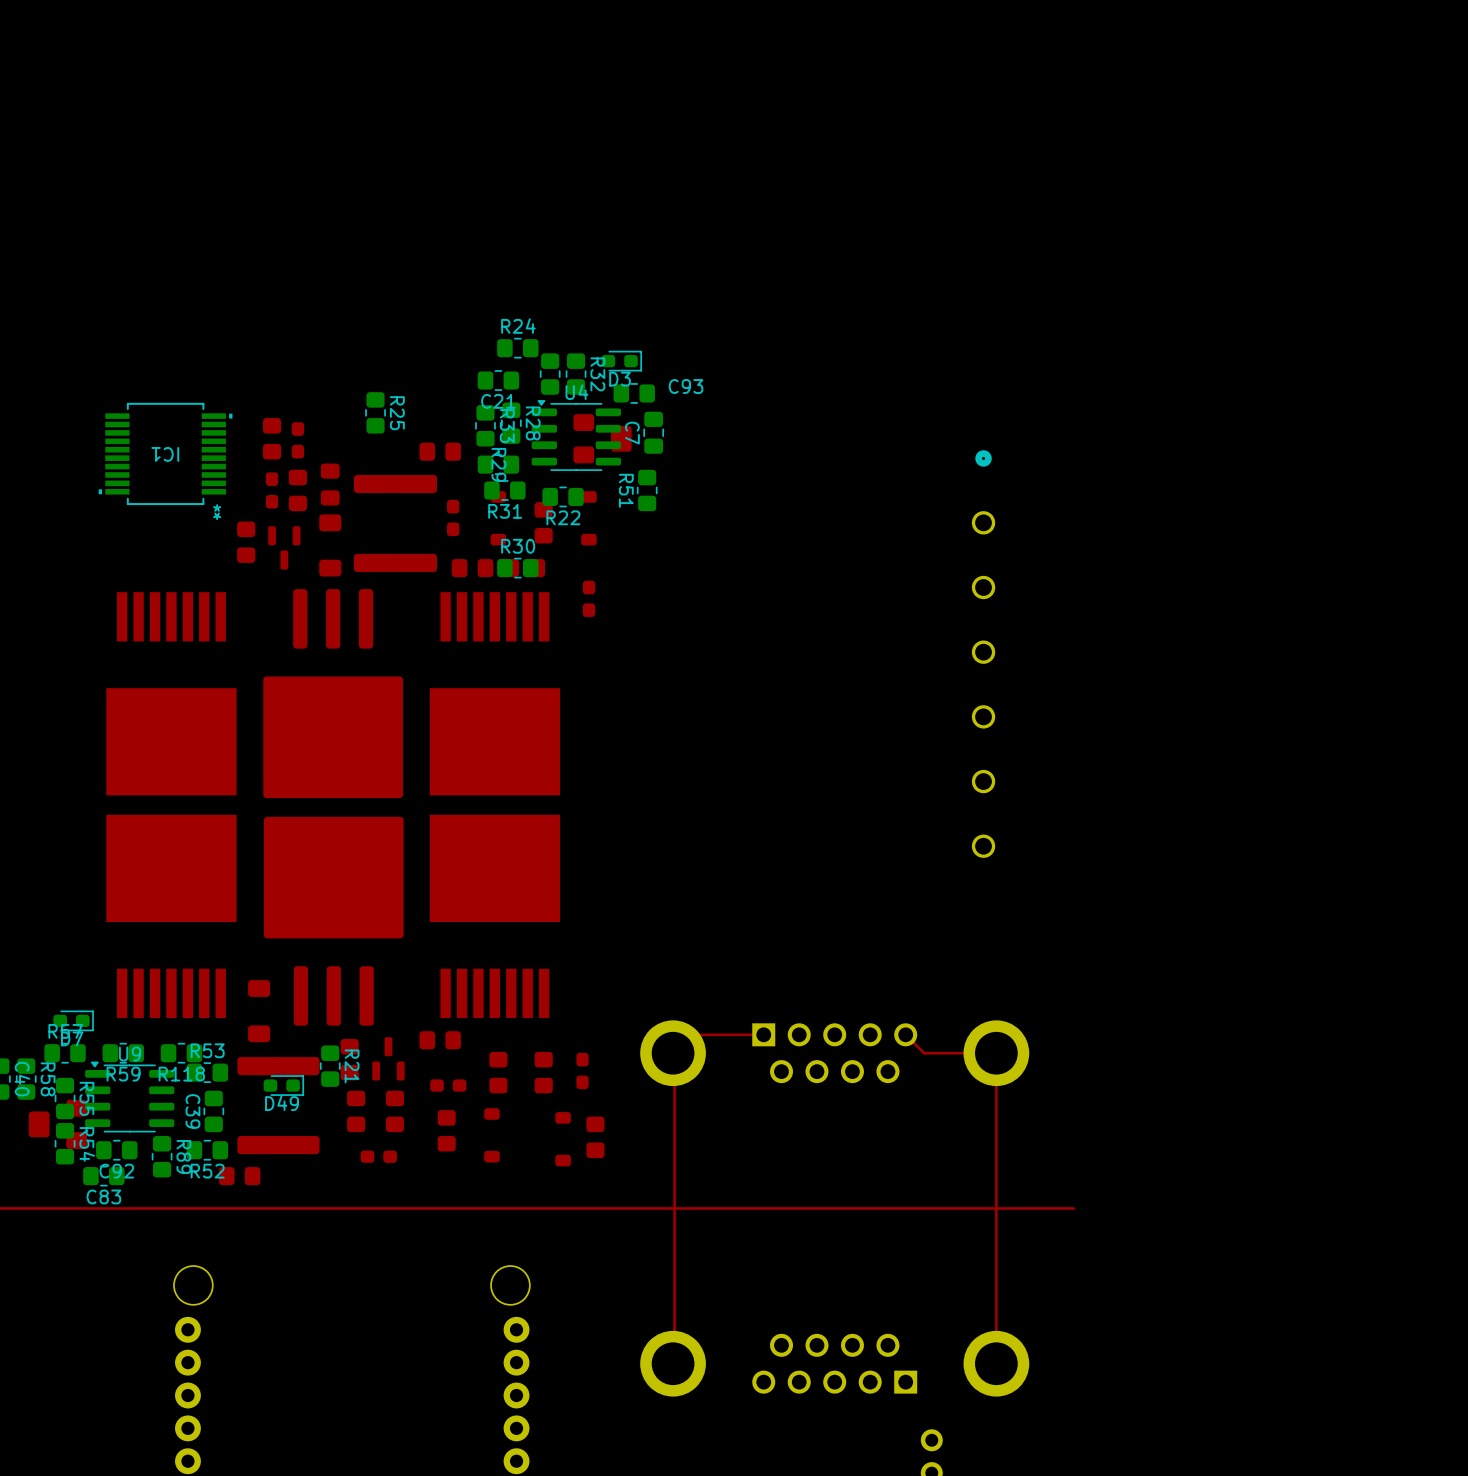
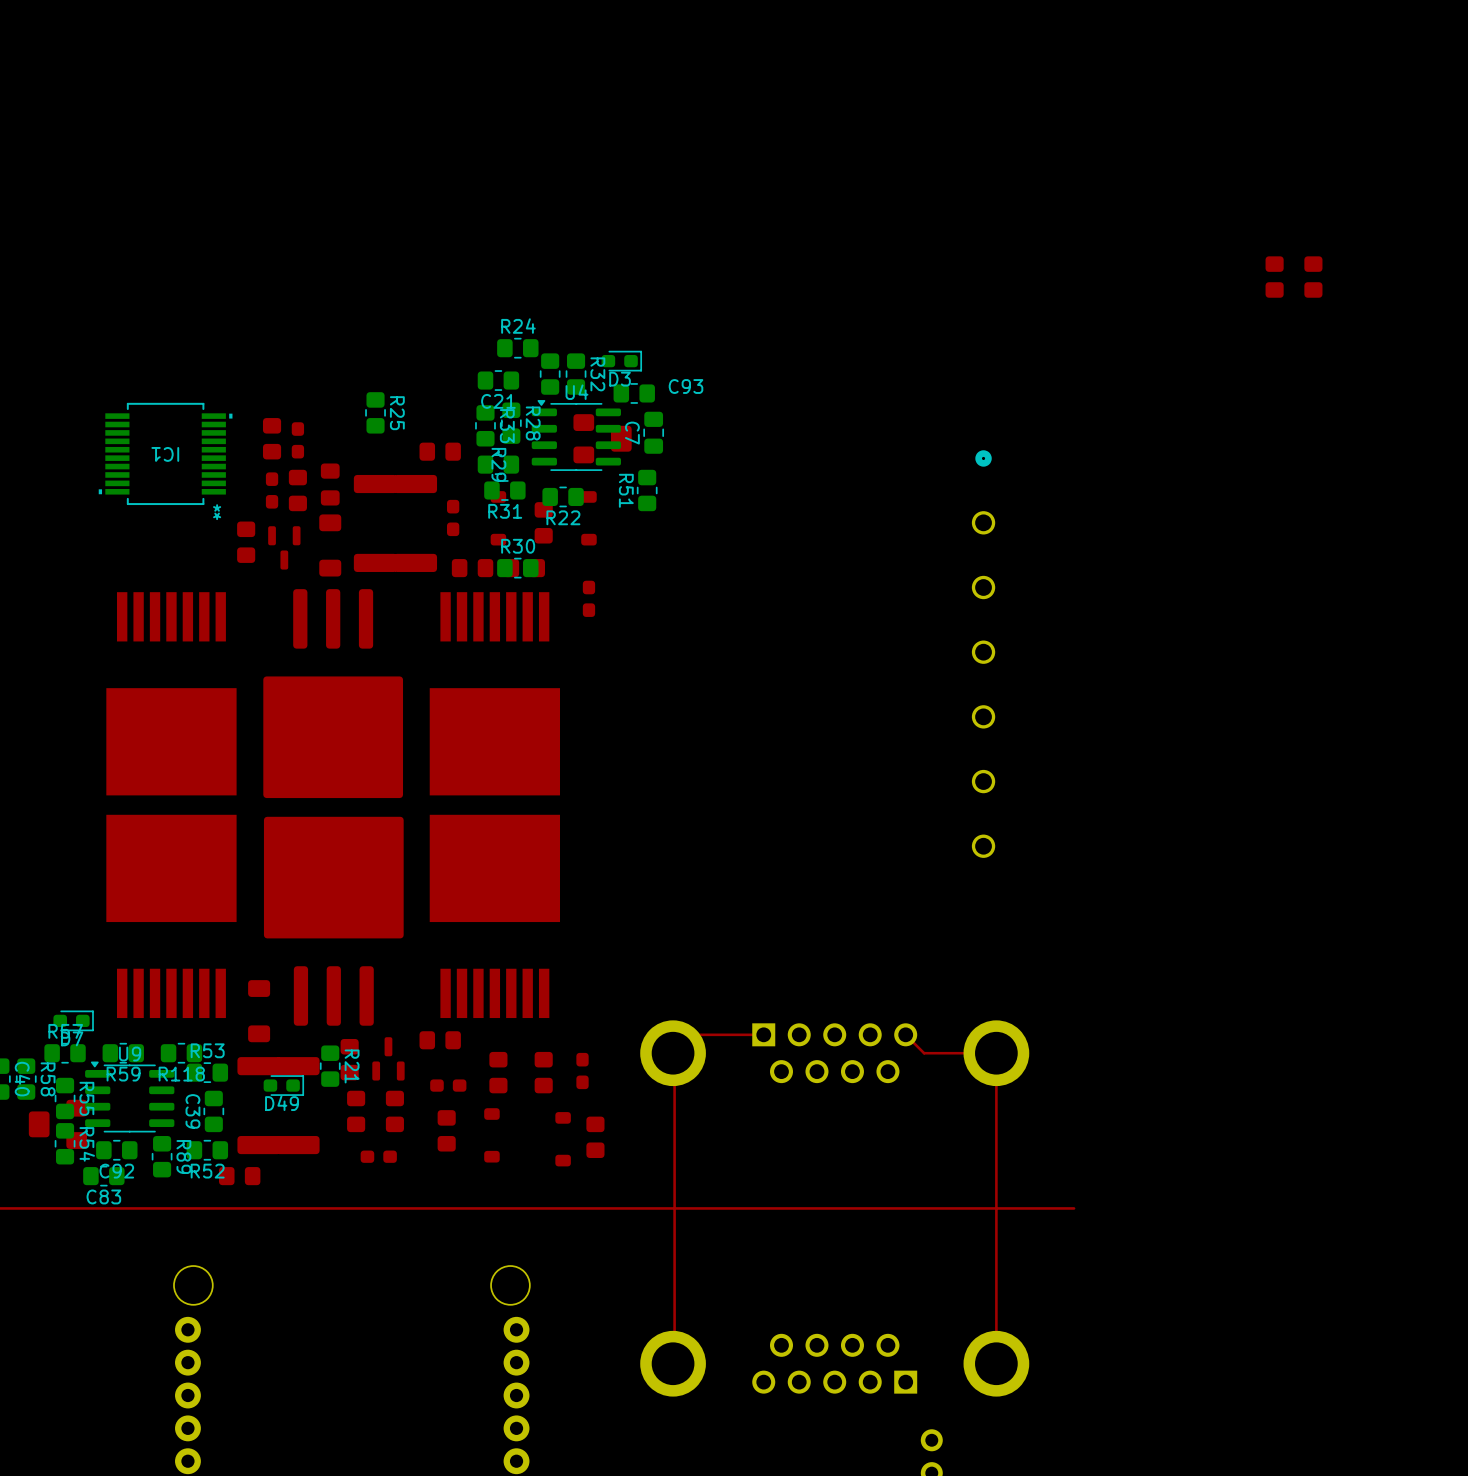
part: none -> (1274, 277)
part: none -> (1313, 277)

